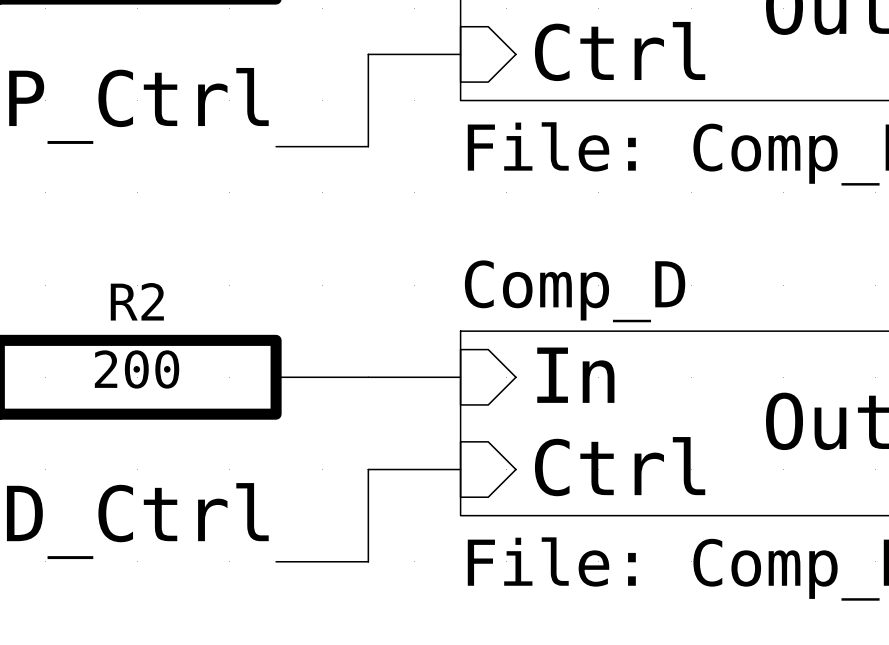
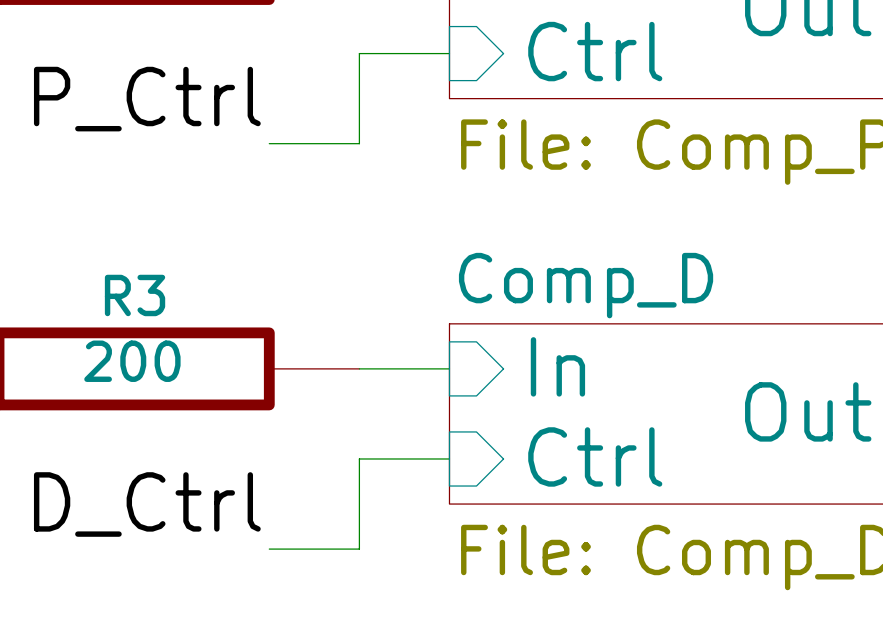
R2 name: R2 (137, 301) -> R3 (135, 295)

